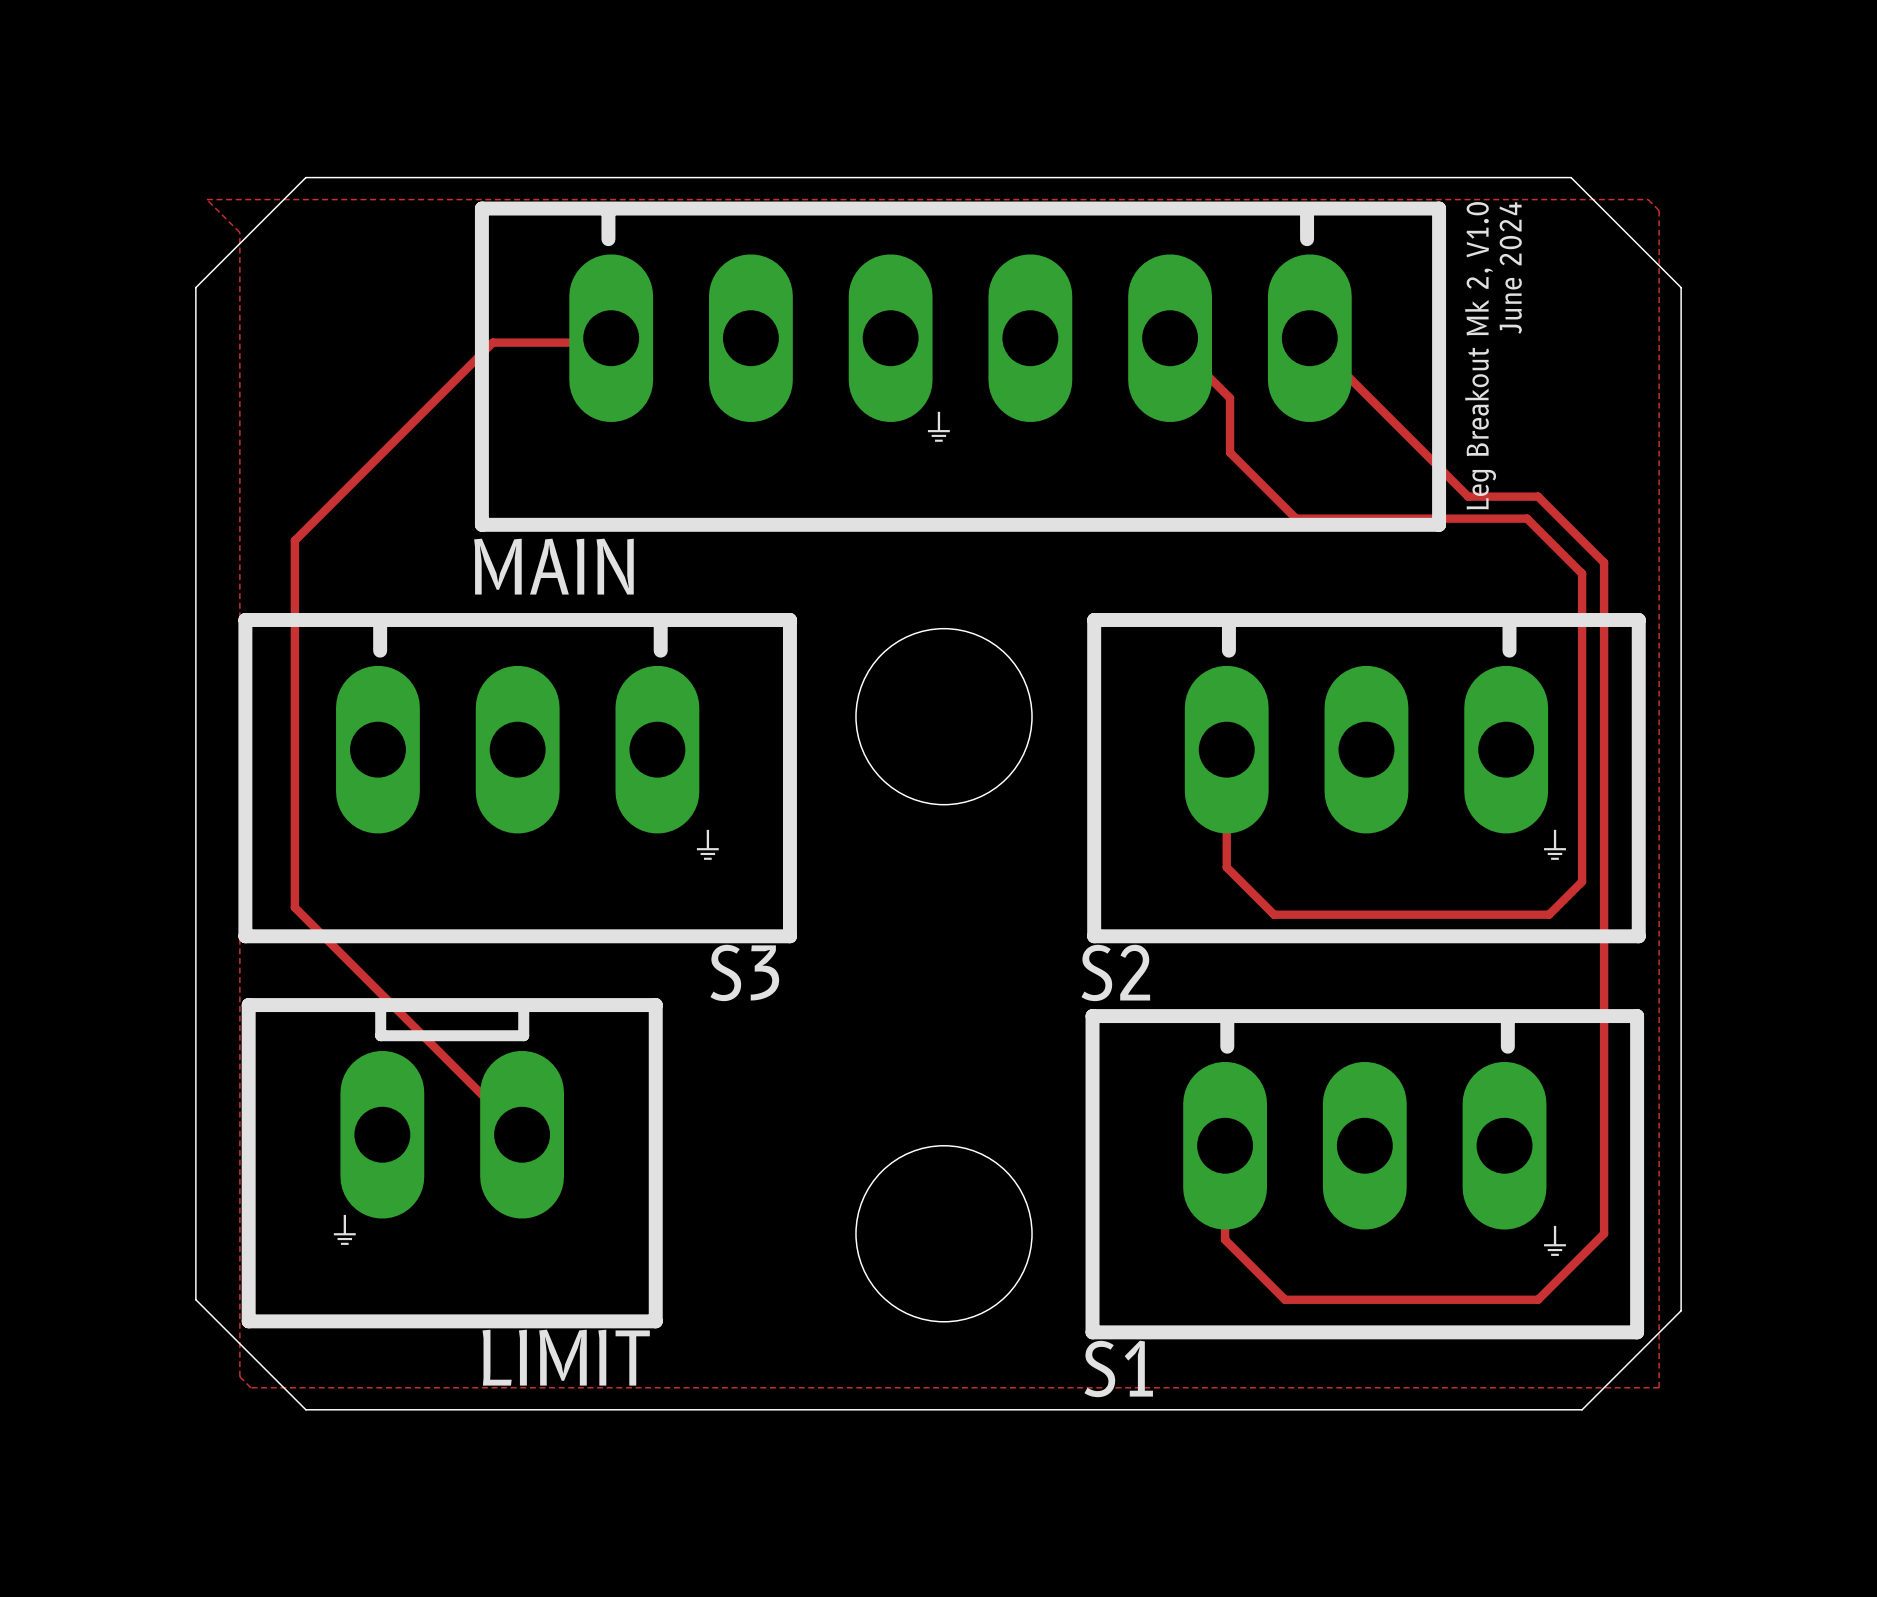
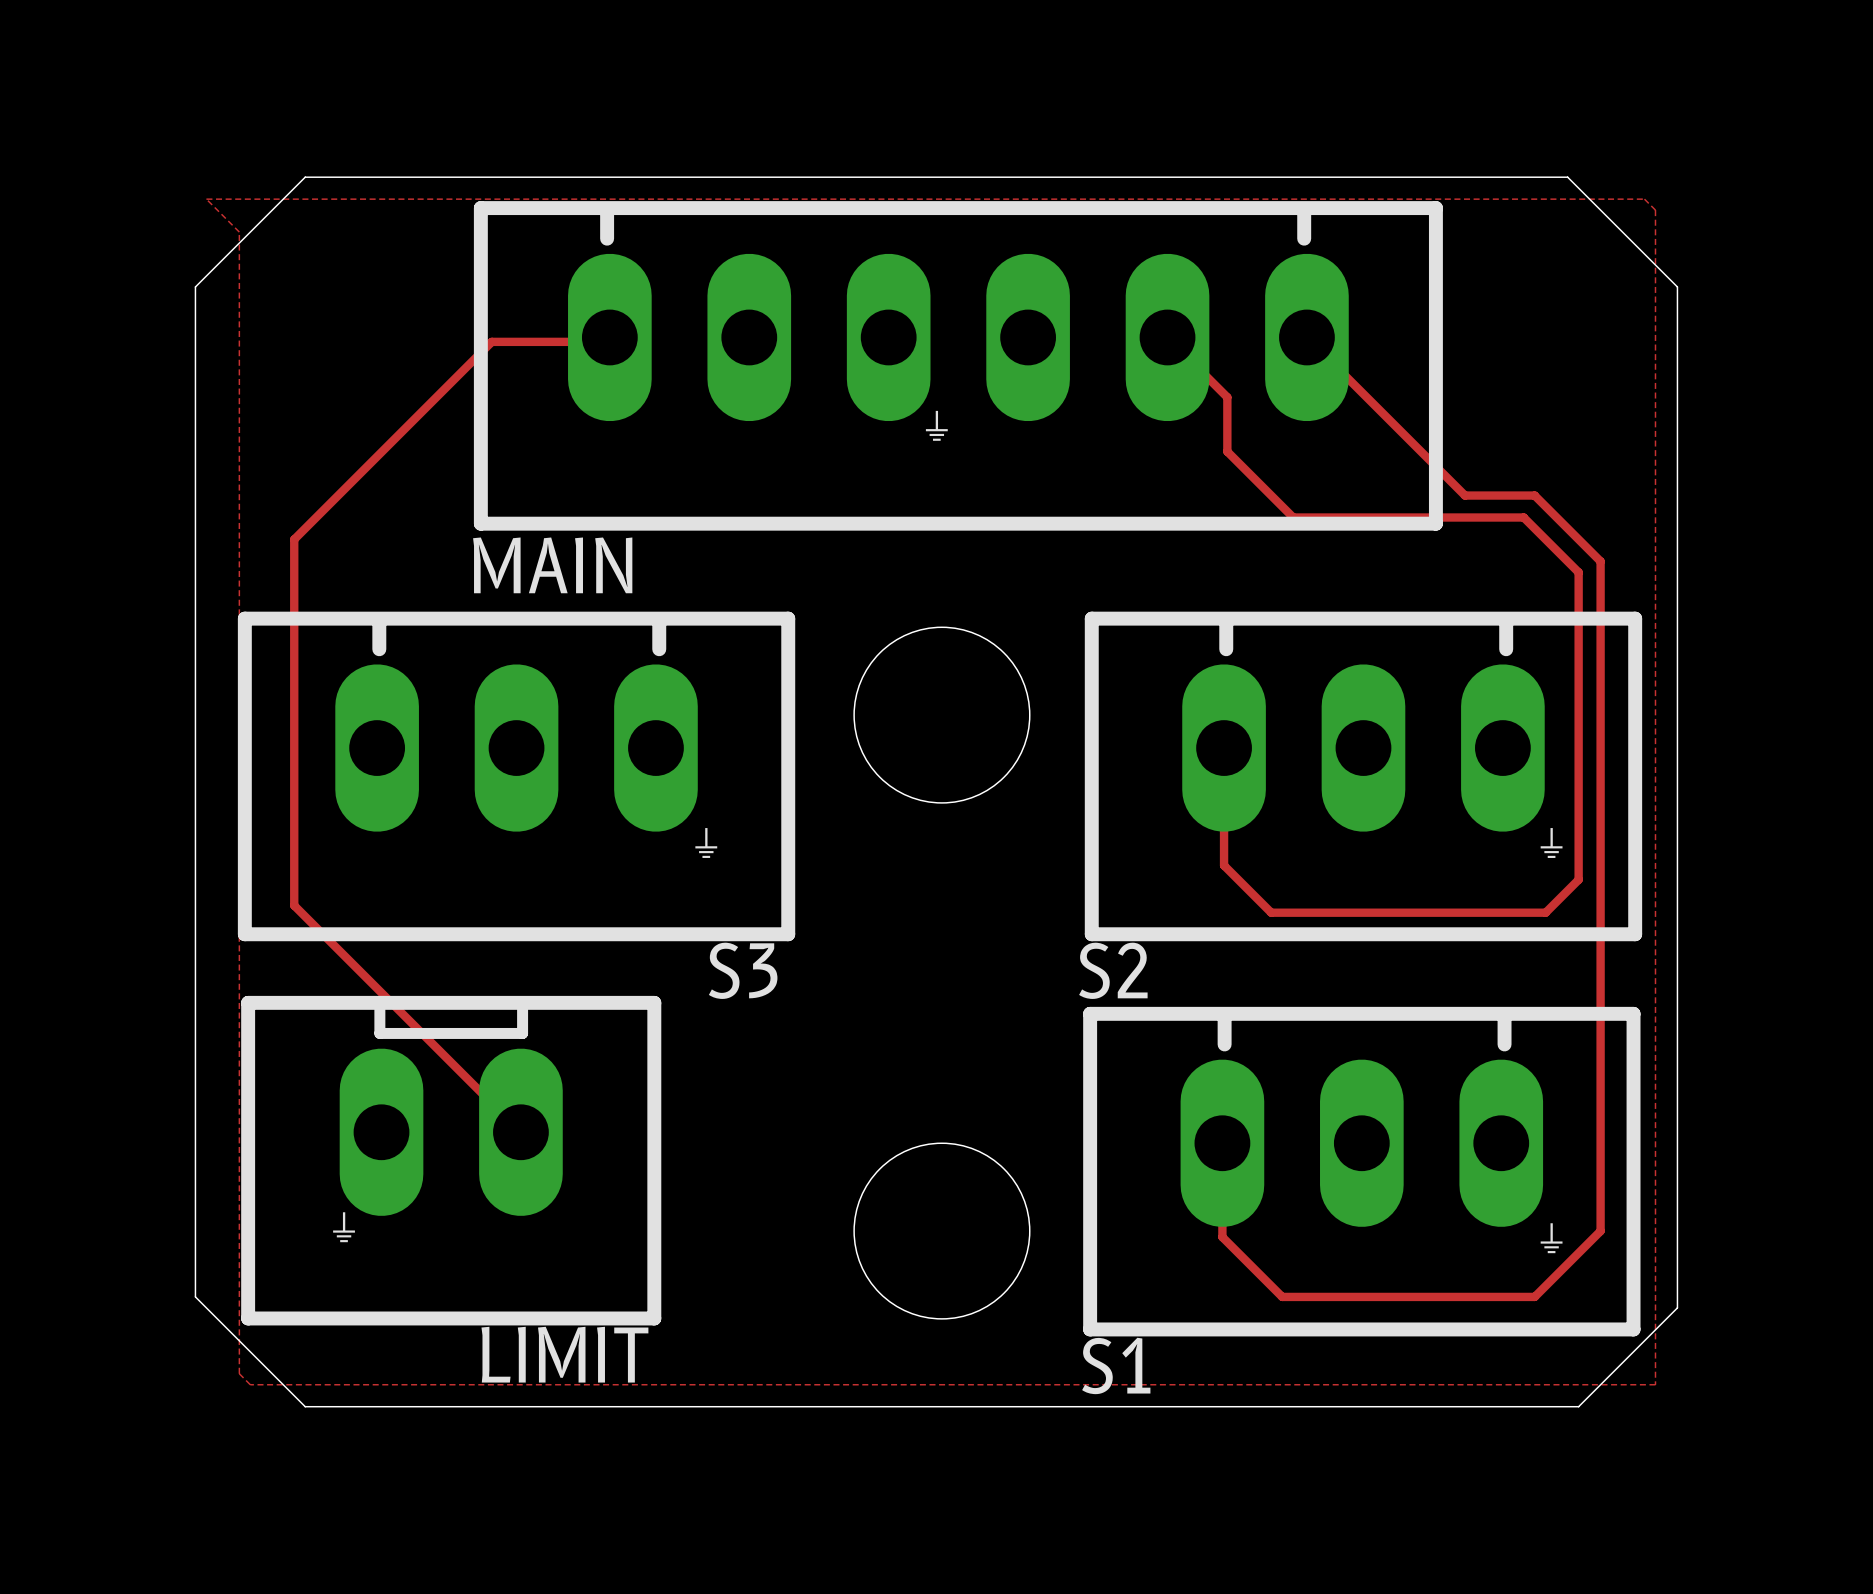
text: June 2024 (1510, 267) -> none
text: Leg Breakout Mk 2, V1.0 (1480, 355) -> none

